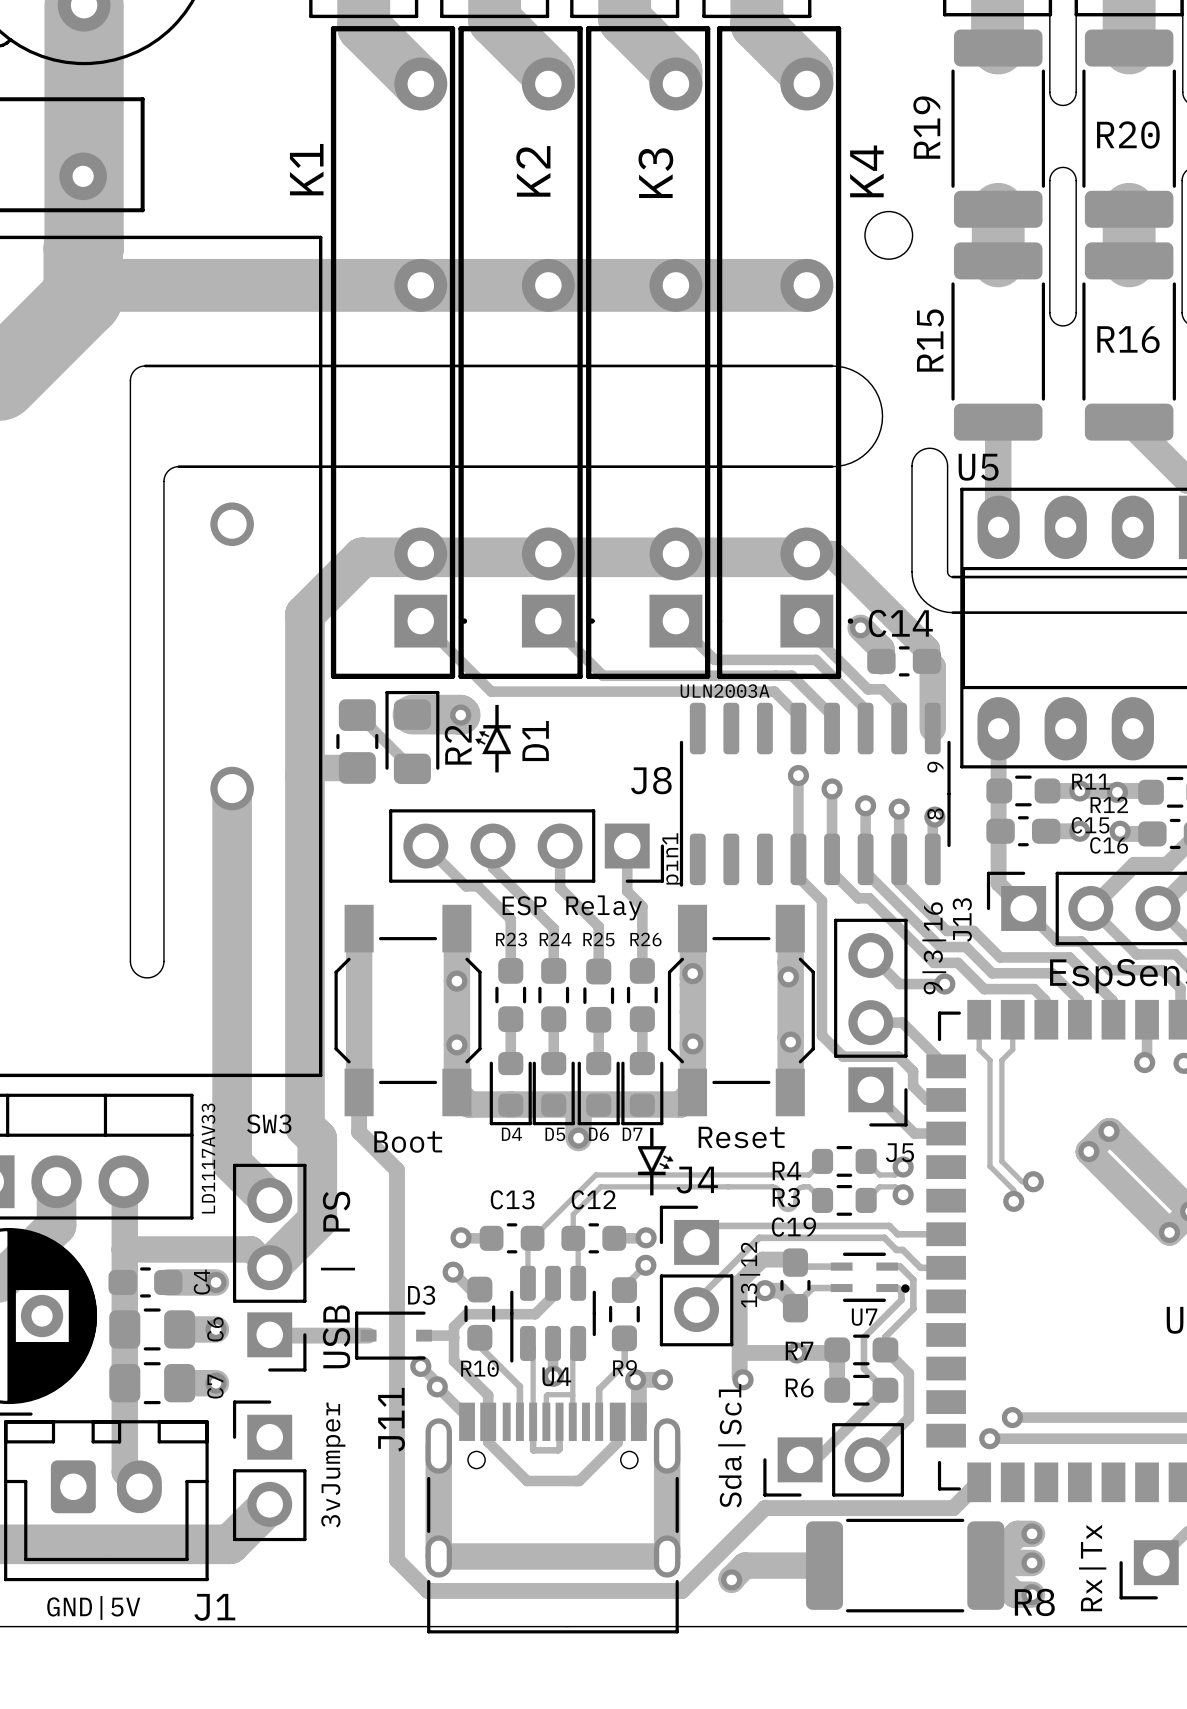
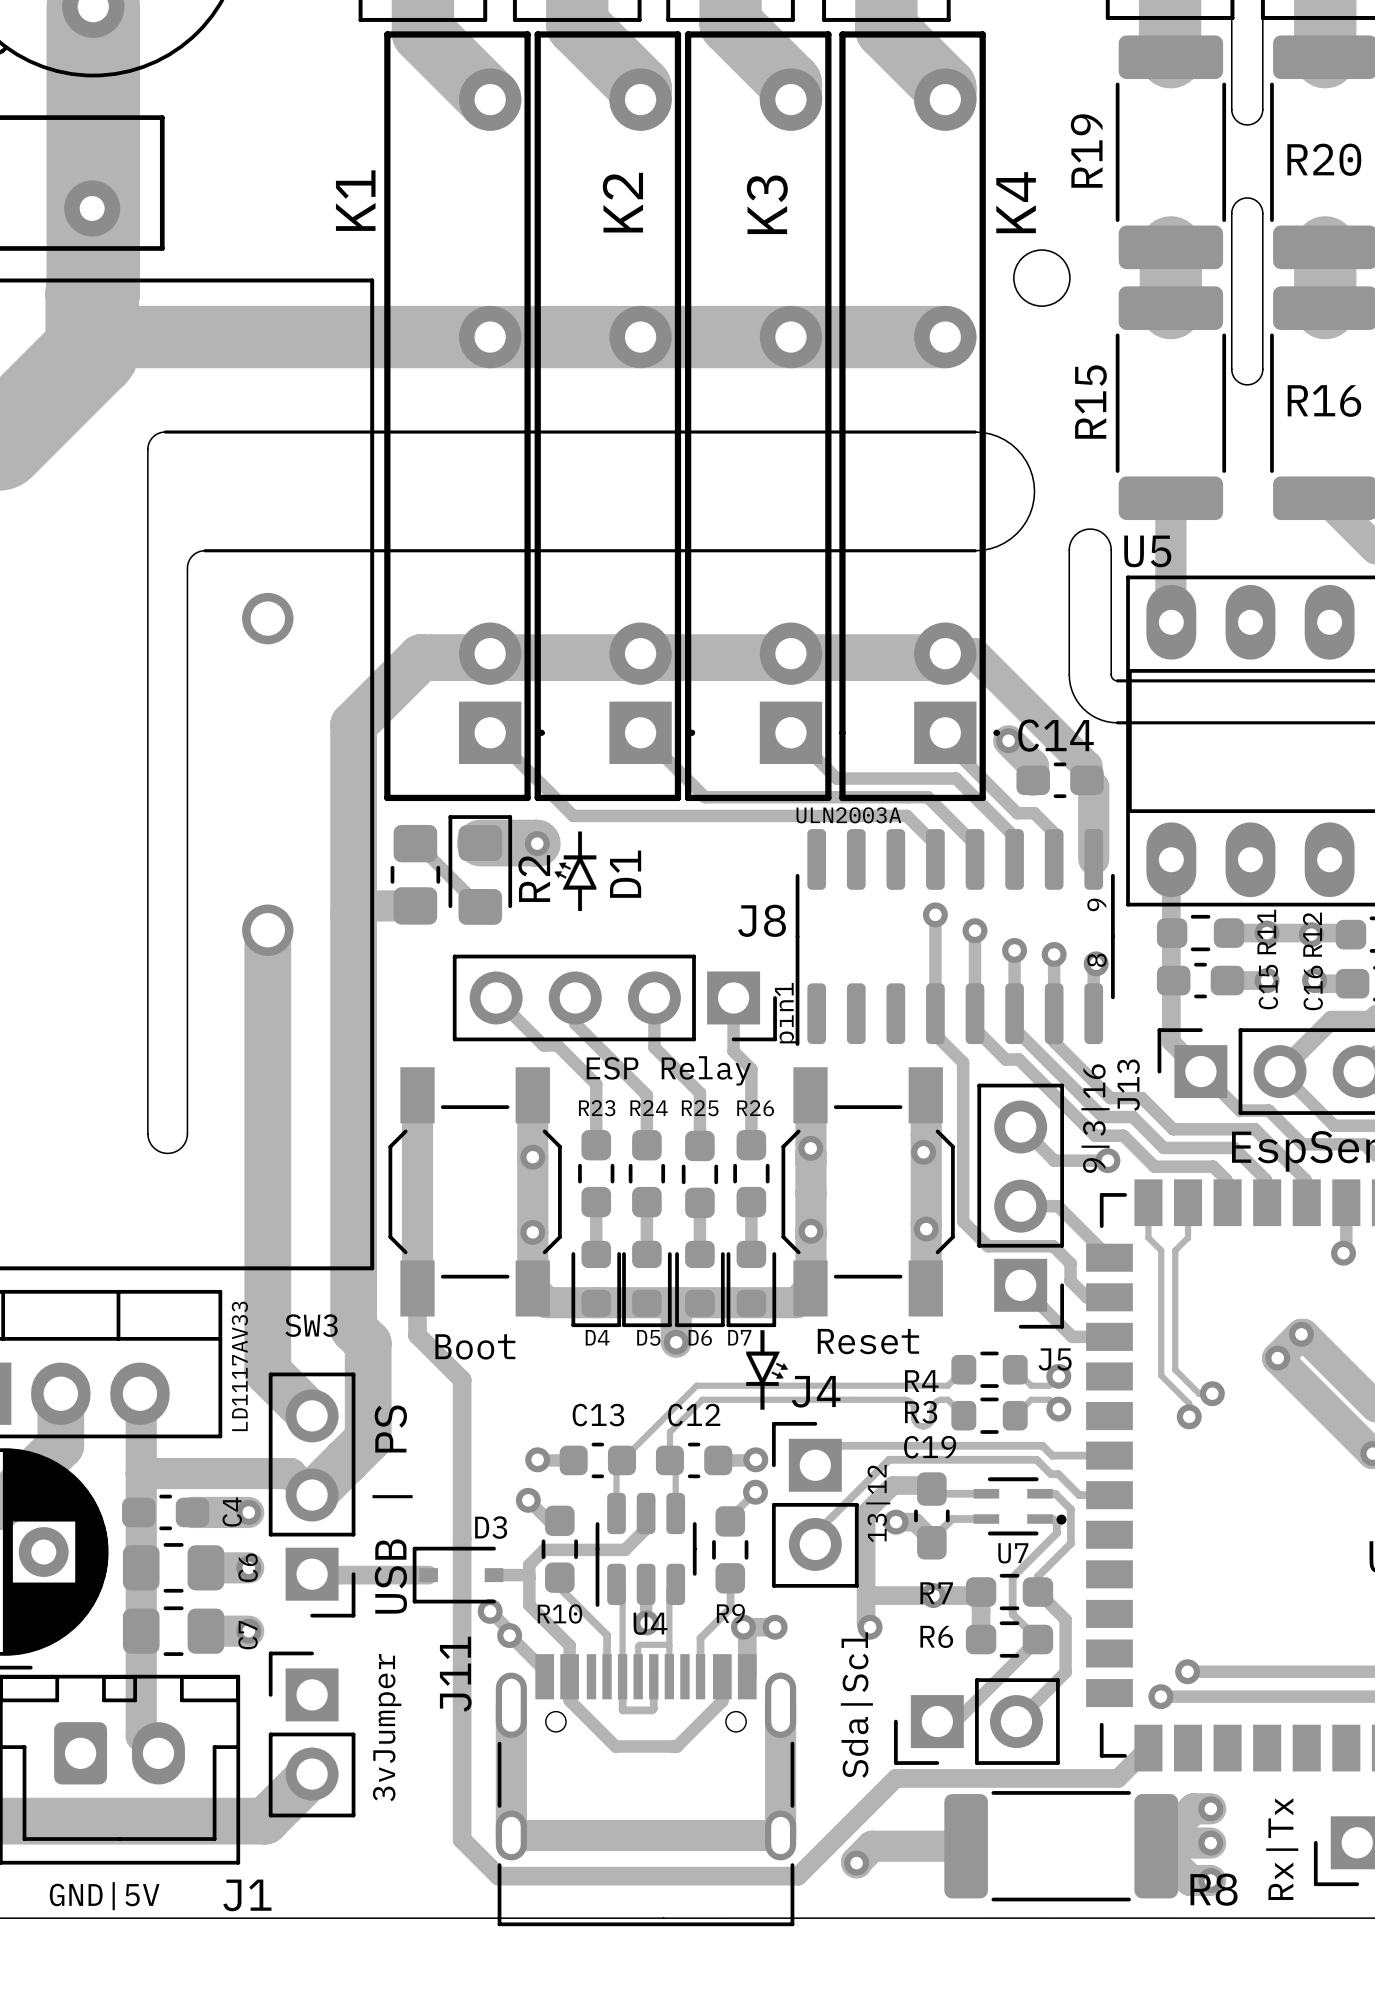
R11 name rotation: 0° (1091, 781) -> 90° counterclockwise (1266, 931)
R12 name rotation: 0° (1109, 805) -> 90° counterclockwise (1312, 934)
C15 name rotation: 0° (1090, 825) -> 90° counterclockwise (1268, 987)
C16 name rotation: 0° (1109, 845) -> 90° counterclockwise (1313, 987)

